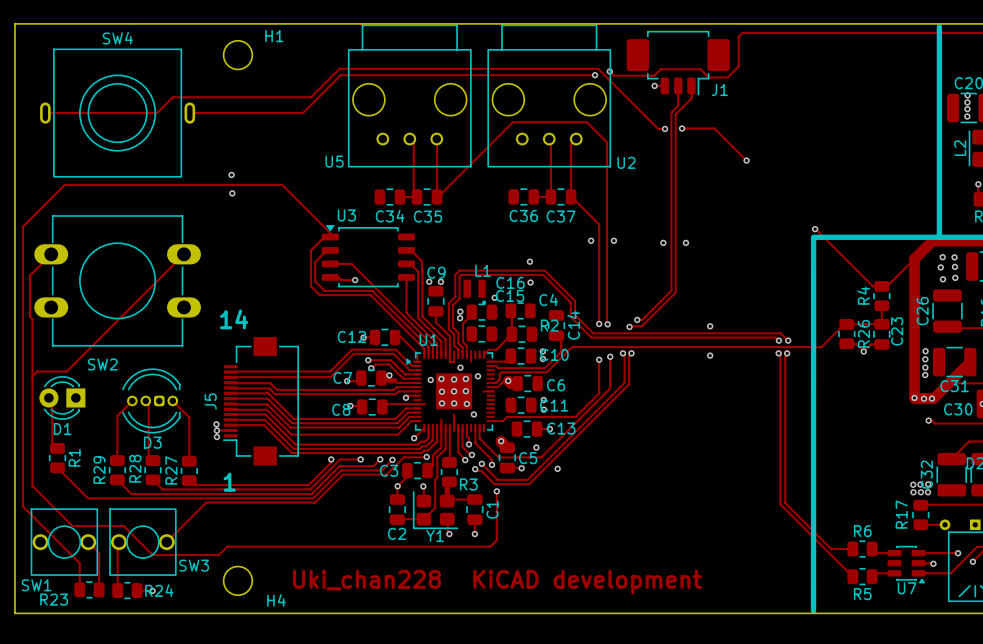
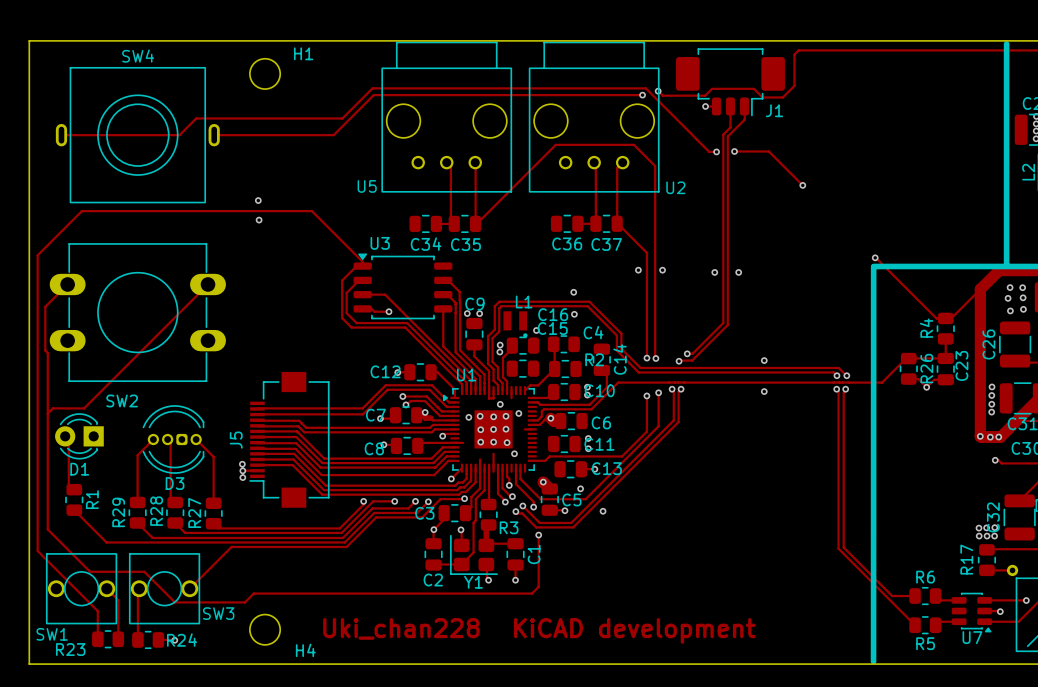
text: 14 (234, 319) -> none
text: 1 (229, 482) -> none

